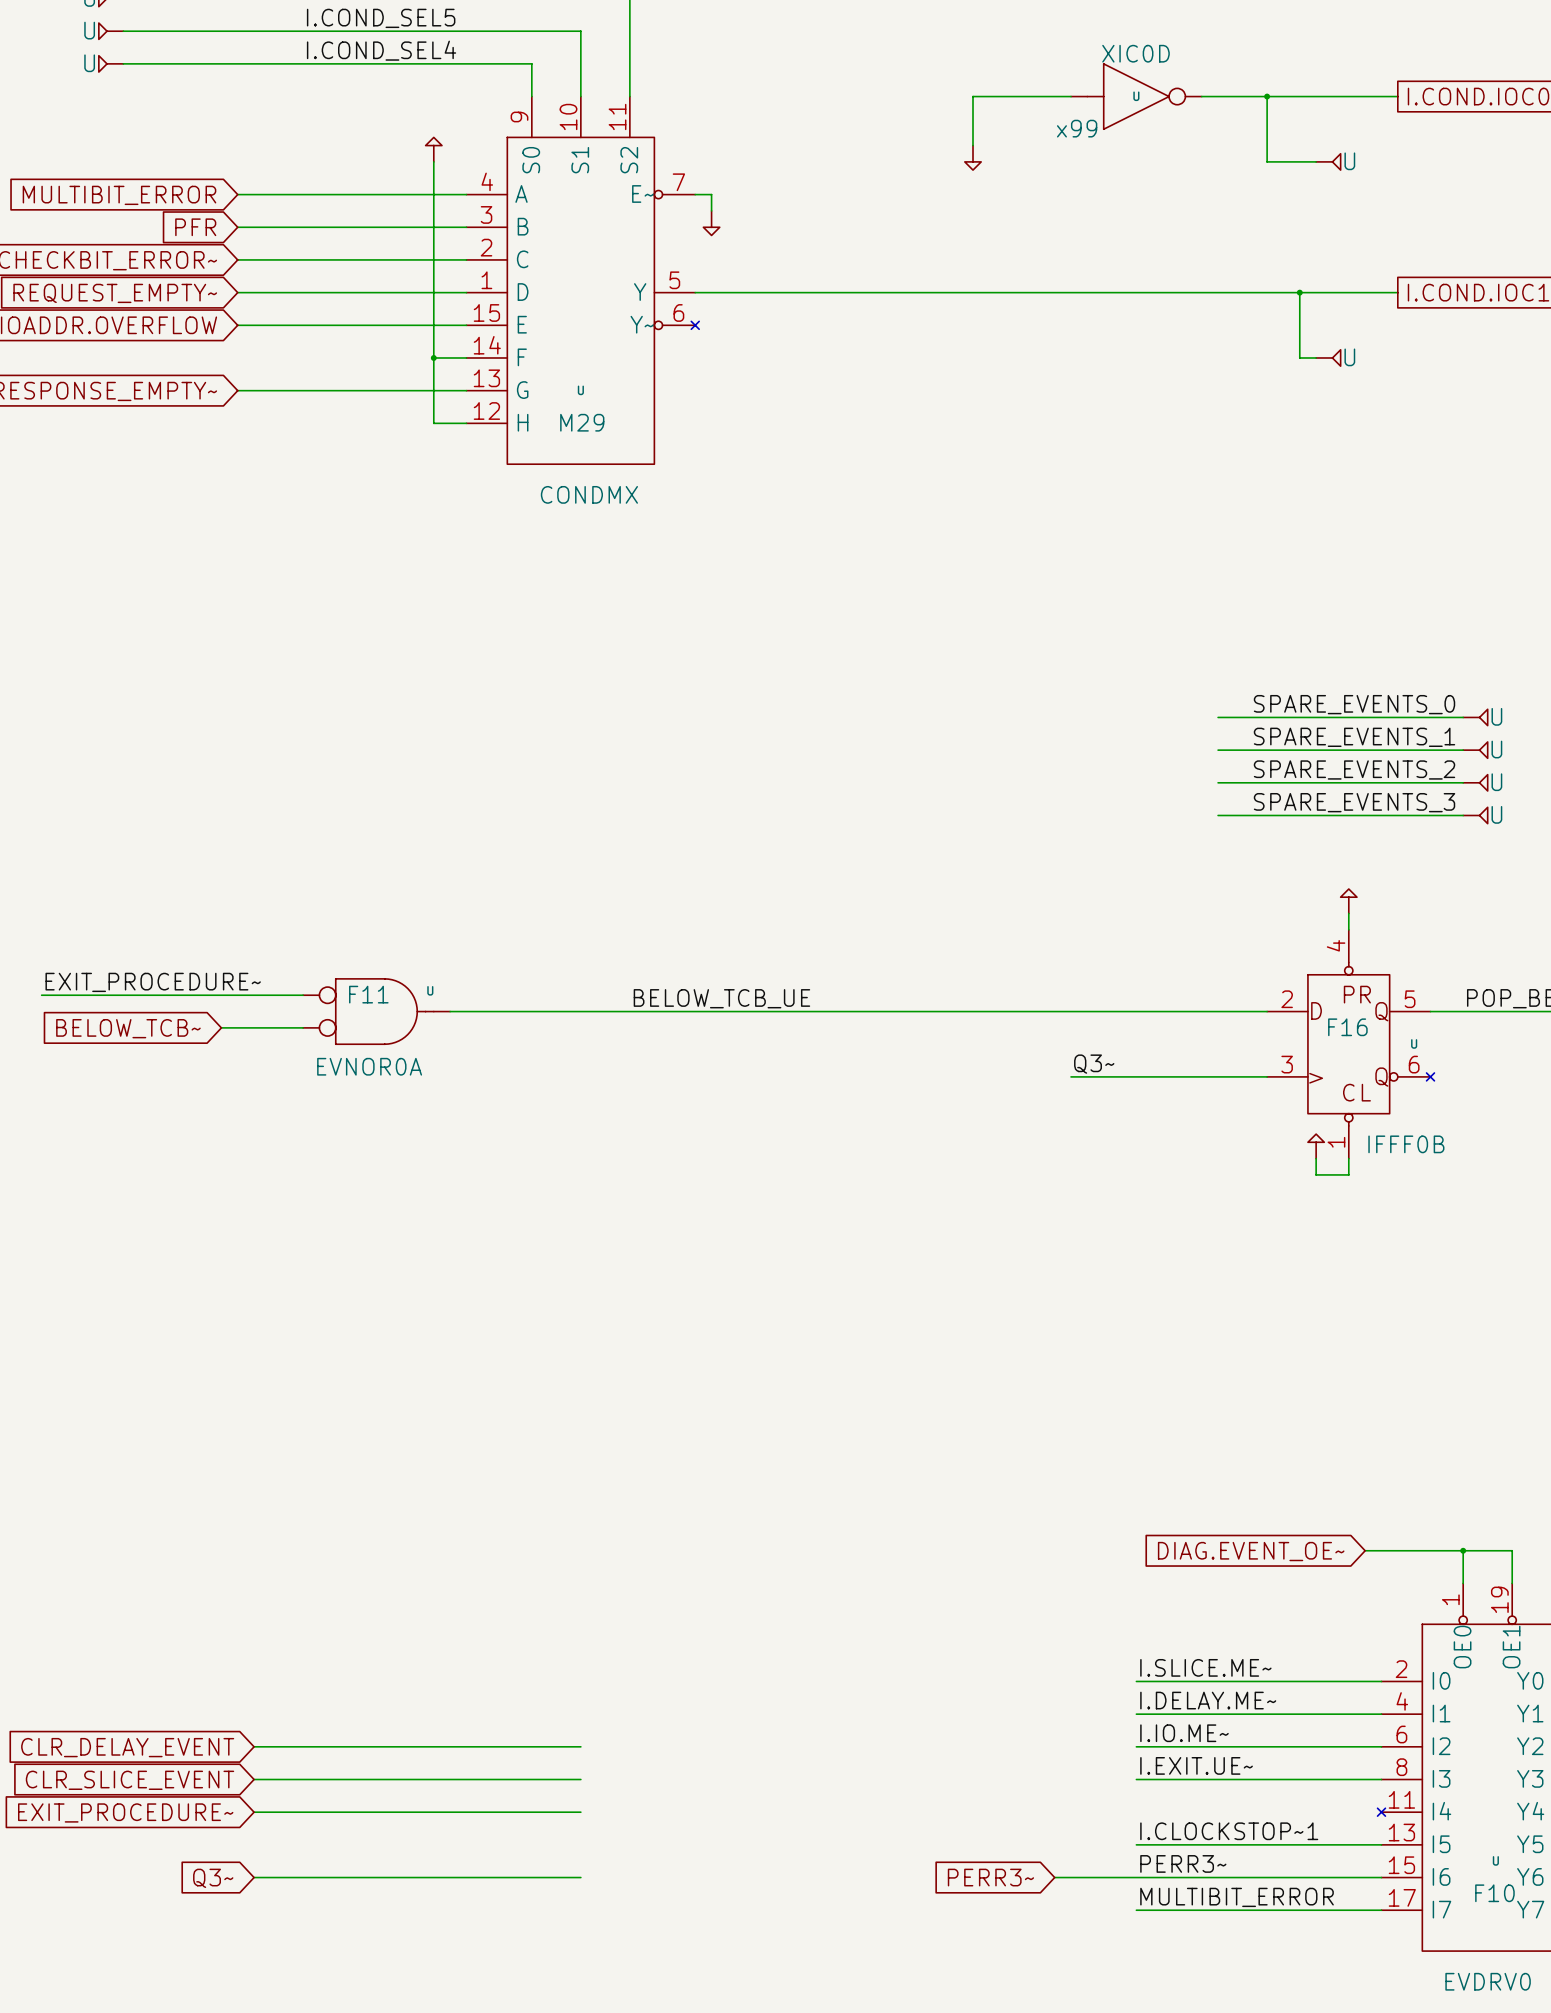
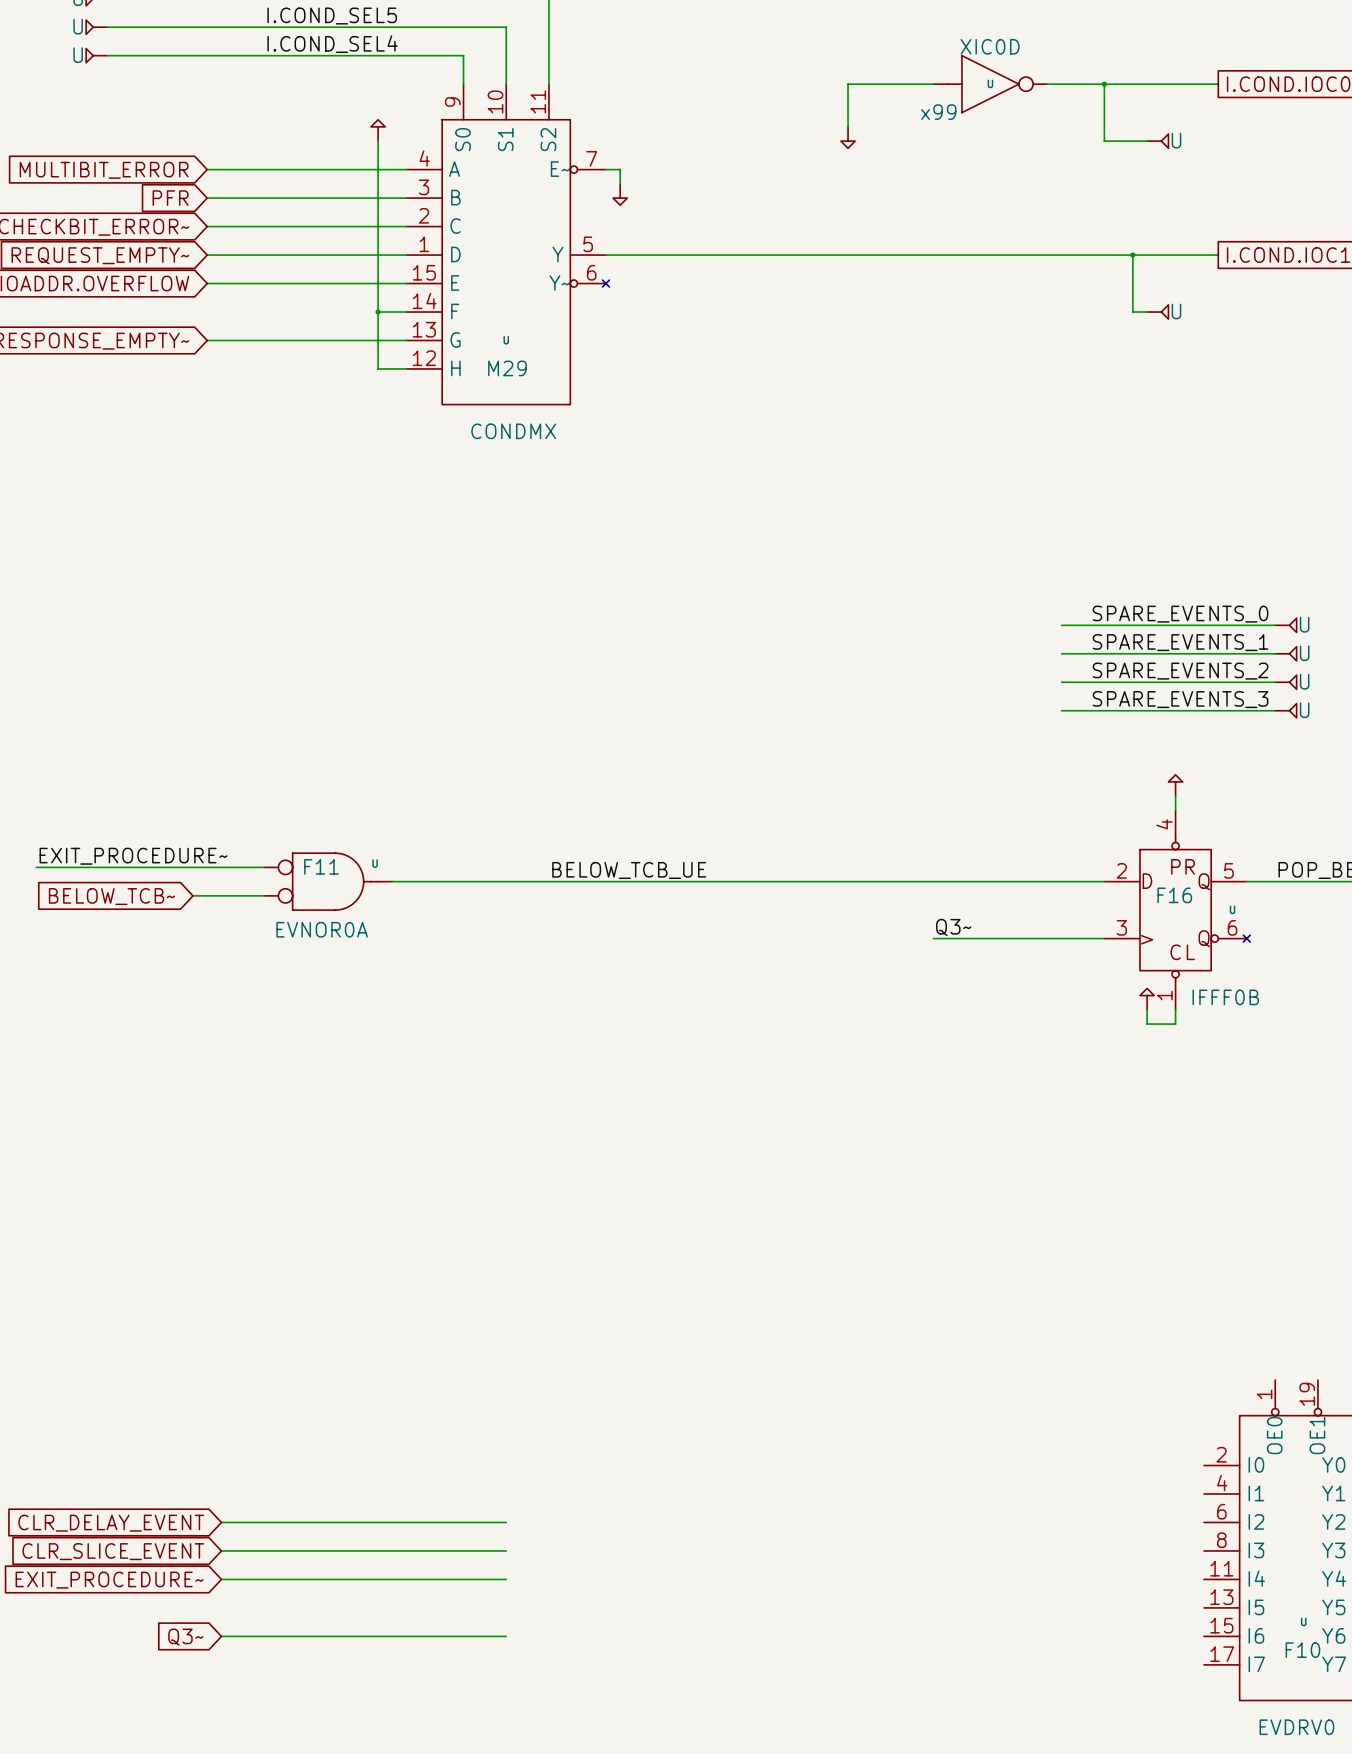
wire: (1365, 1550) (1512, 1550) (1512, 1583) -> none
wire: (1463, 1550) (1463, 1583) -> none
junction: (1463, 1550) -> none
global label: DIAG.EVENT_OE~ (1251, 1551) -> none
label: I.SLICE.ME~ (1205, 1667) -> none
wire: (1136, 1681) (1381, 1681) -> none
label: I.DELAY.ME~ (1208, 1700) -> none
wire: (1136, 1714) (1381, 1714) -> none
label: I.IO.ME~ (1184, 1733) -> none
wire: (1136, 1746) (1381, 1746) -> none
label: I.EXIT.UE~ (1196, 1765) -> none
wire: (1136, 1779) (1381, 1779) -> none
no-connect mark: (1381, 1812) -> none
label: I.CLOCKSTOP~1 (1229, 1831) -> none
wire: (1136, 1844) (1381, 1844) -> none
label: PERR3~ (1183, 1863) -> none
global label: PERR3~ (990, 1877) -> none
wire: (1054, 1877) (1381, 1877) -> none
label: MULTIBIT_ERROR (1237, 1897) -> none
wire: (1136, 1910) (1381, 1910) -> none

